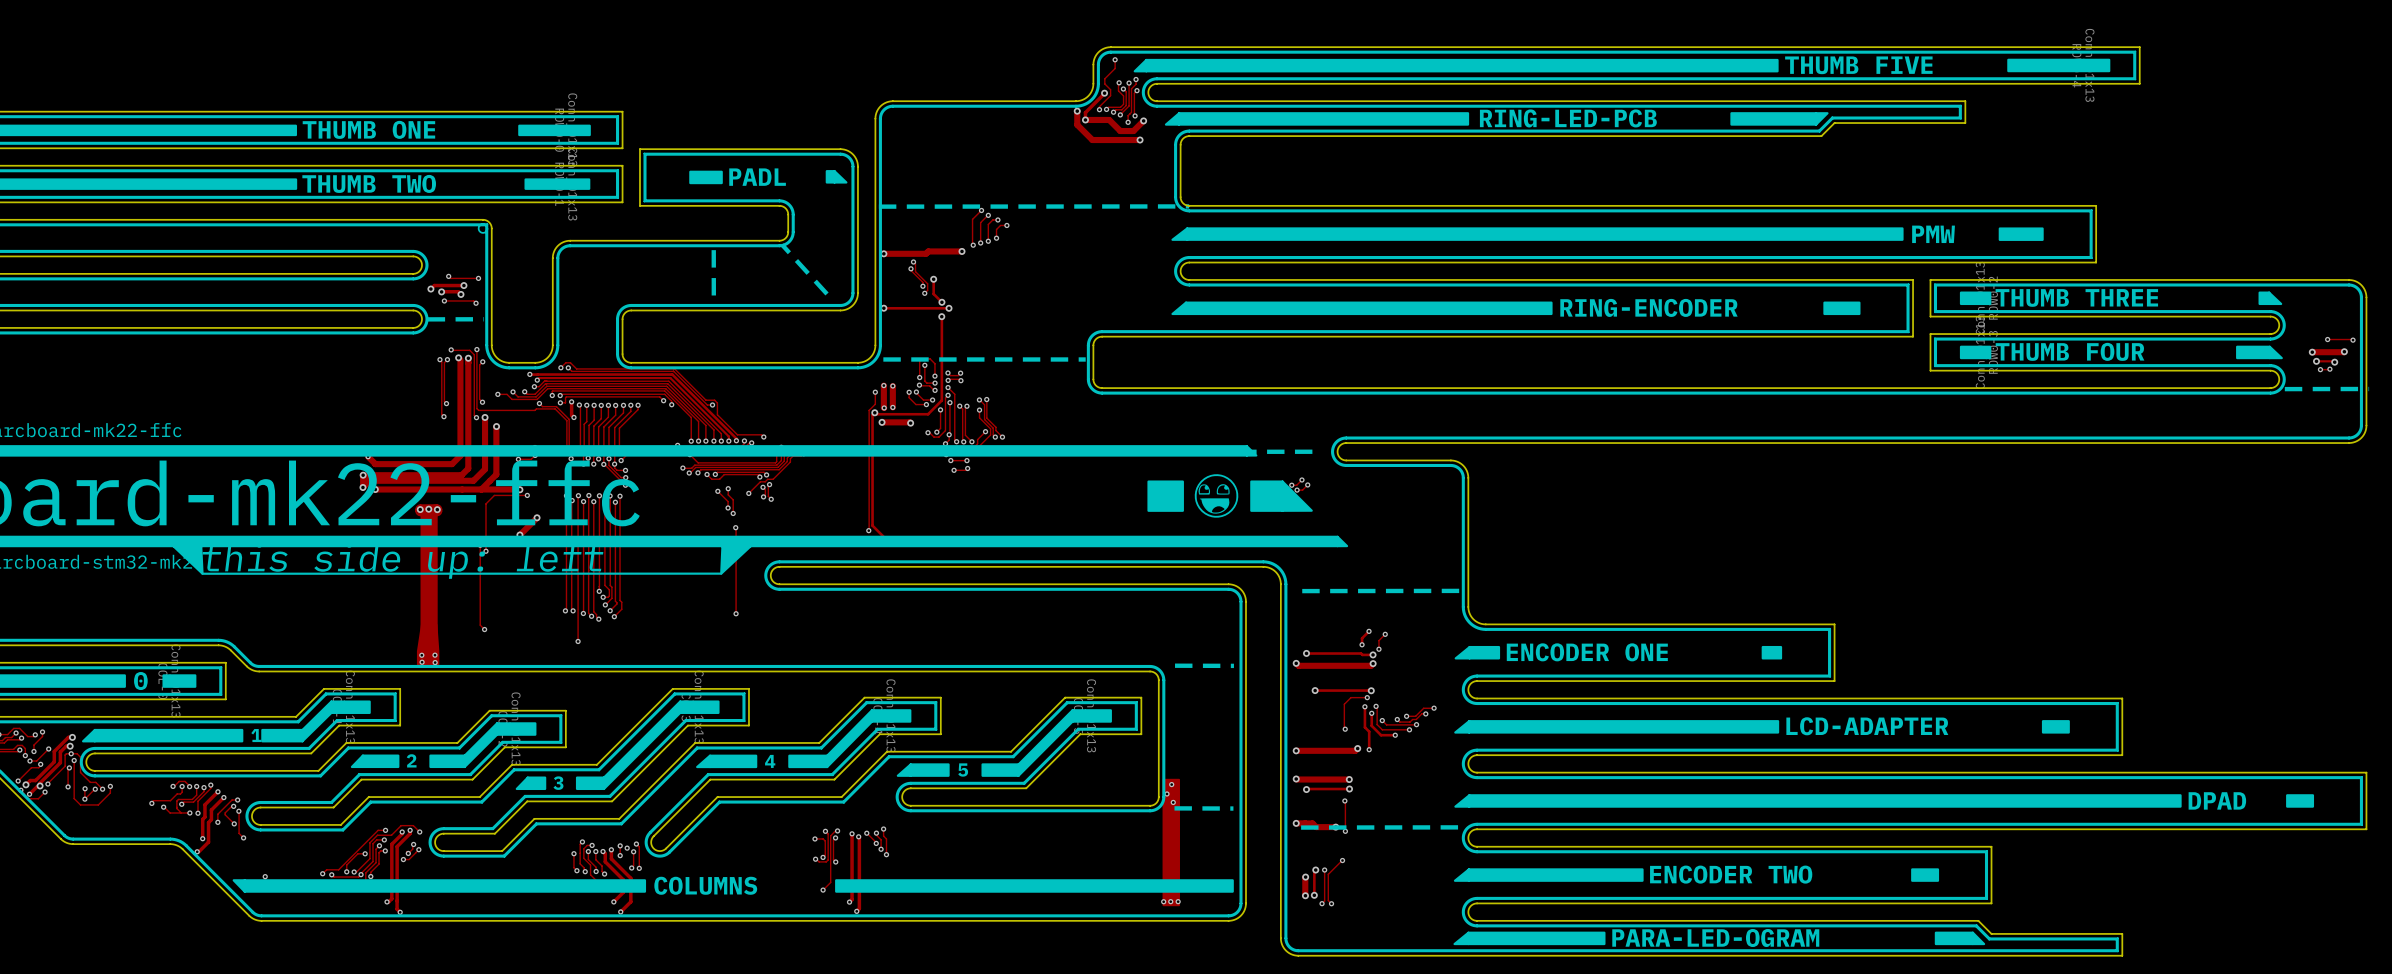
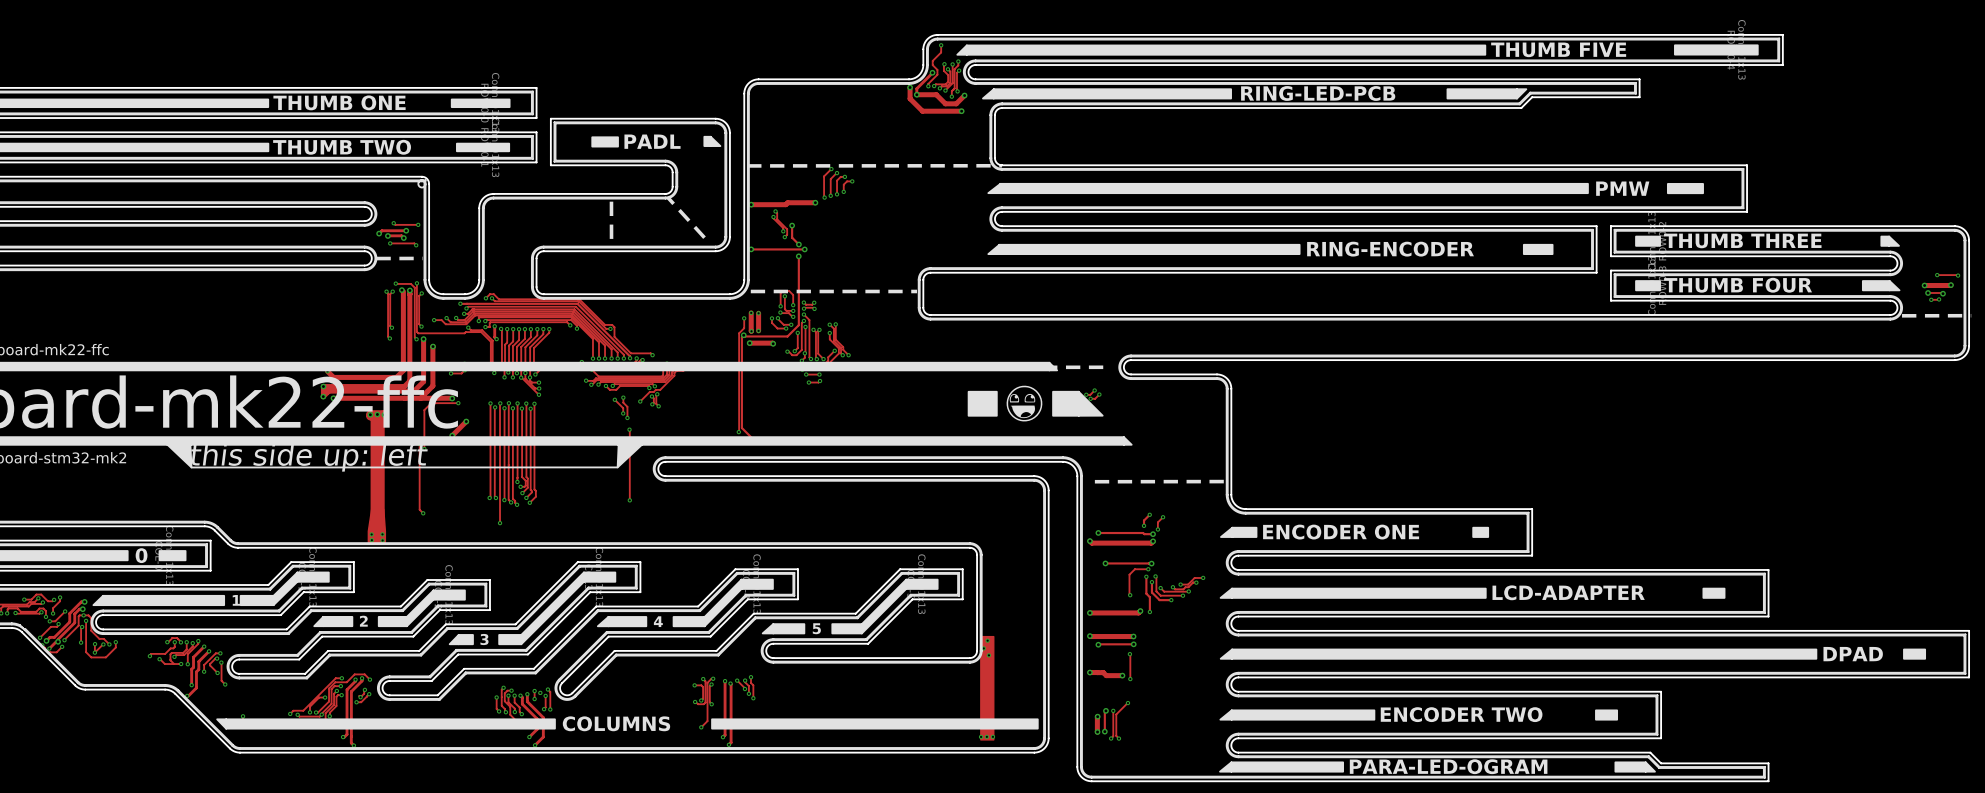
line: (1175, 665) (1233, 665) -> none
line: (1174, 808) (1233, 808) -> none
line: (1461, 827) (1301, 827) -> none

